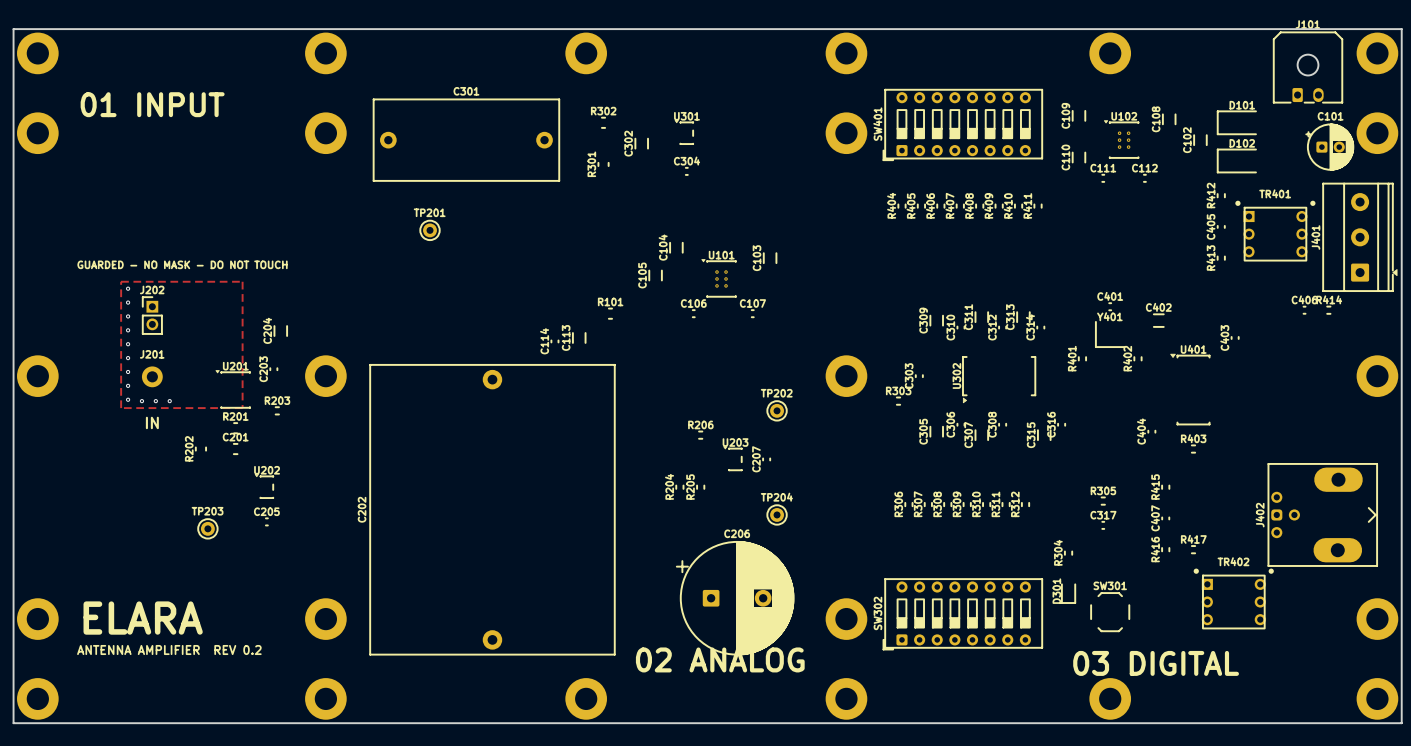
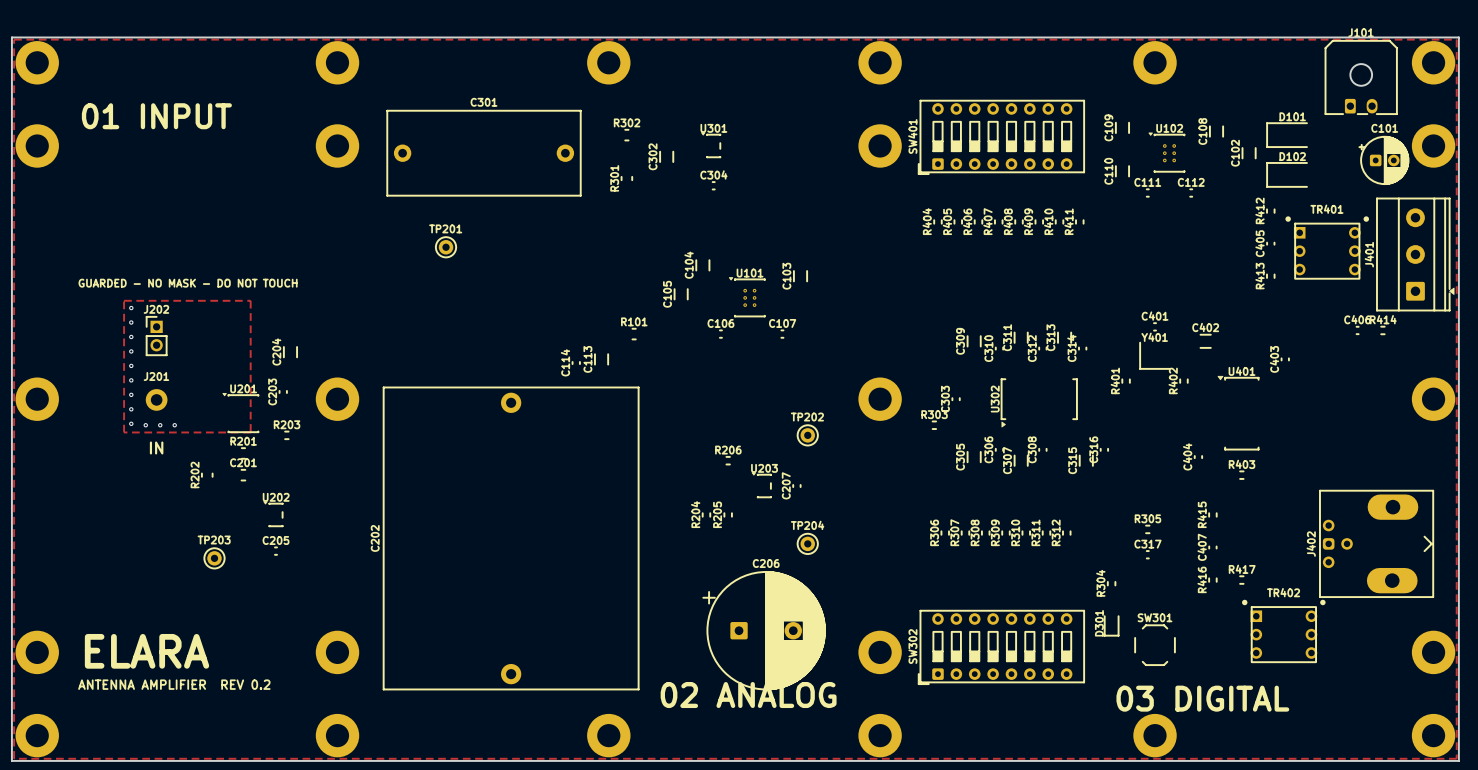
zone outline: none -> (14, 39) (1456, 39) (1456, 758) (14, 758) (14, 39)

